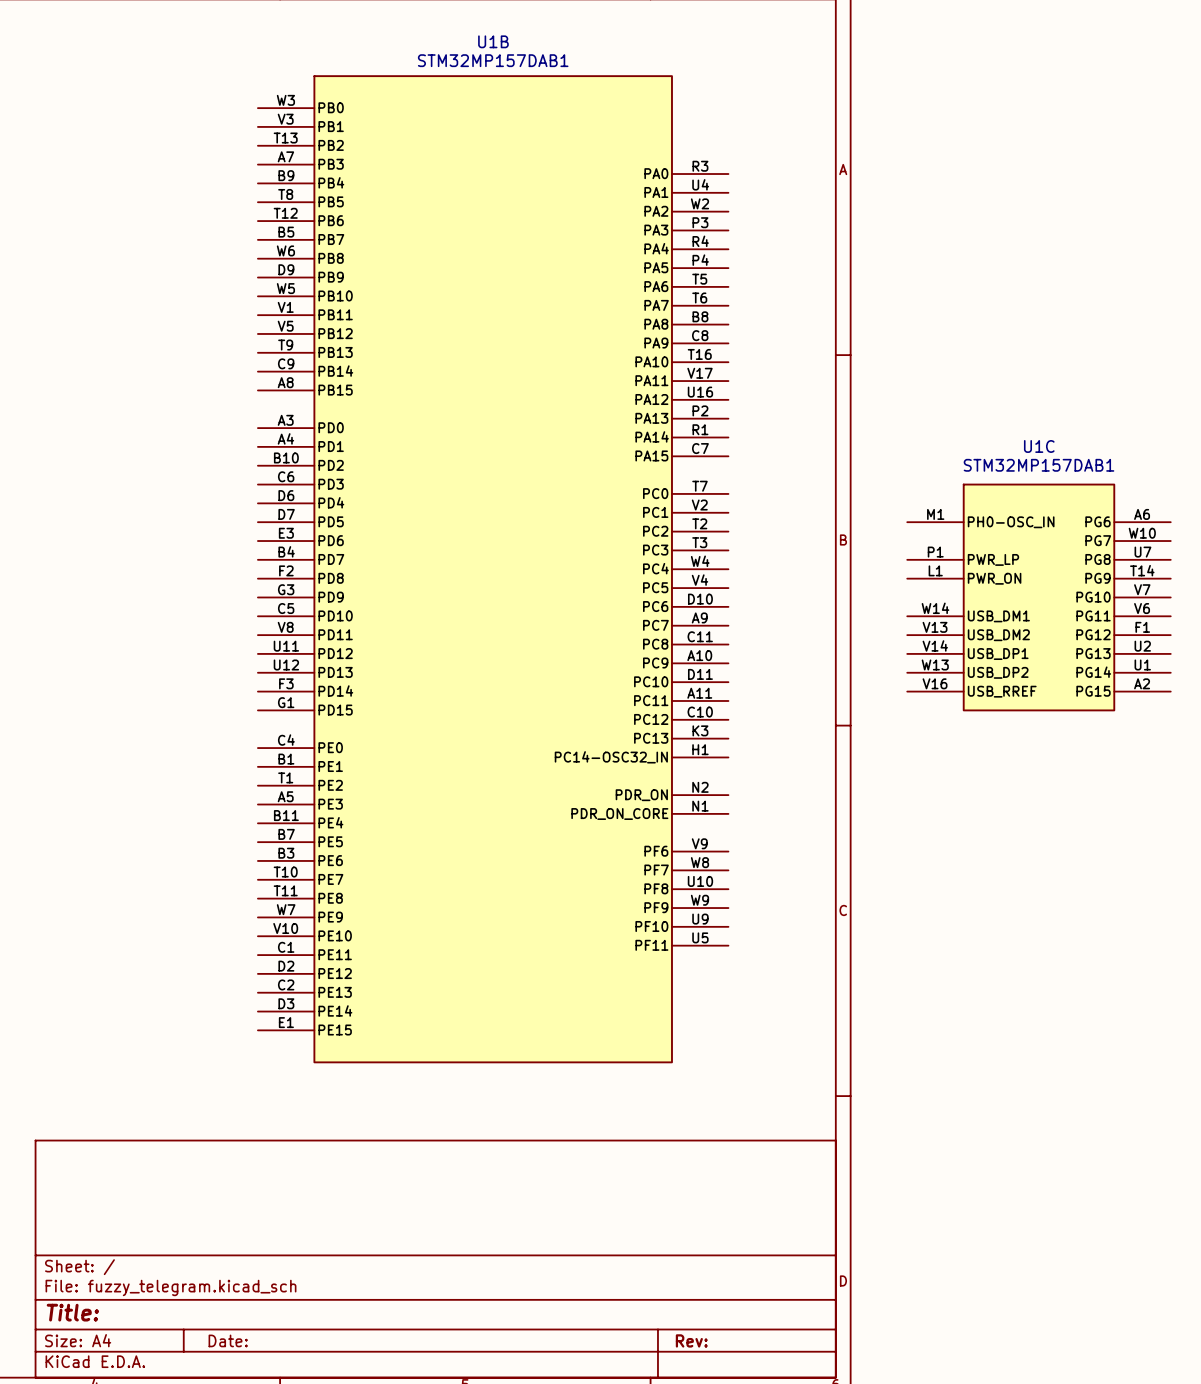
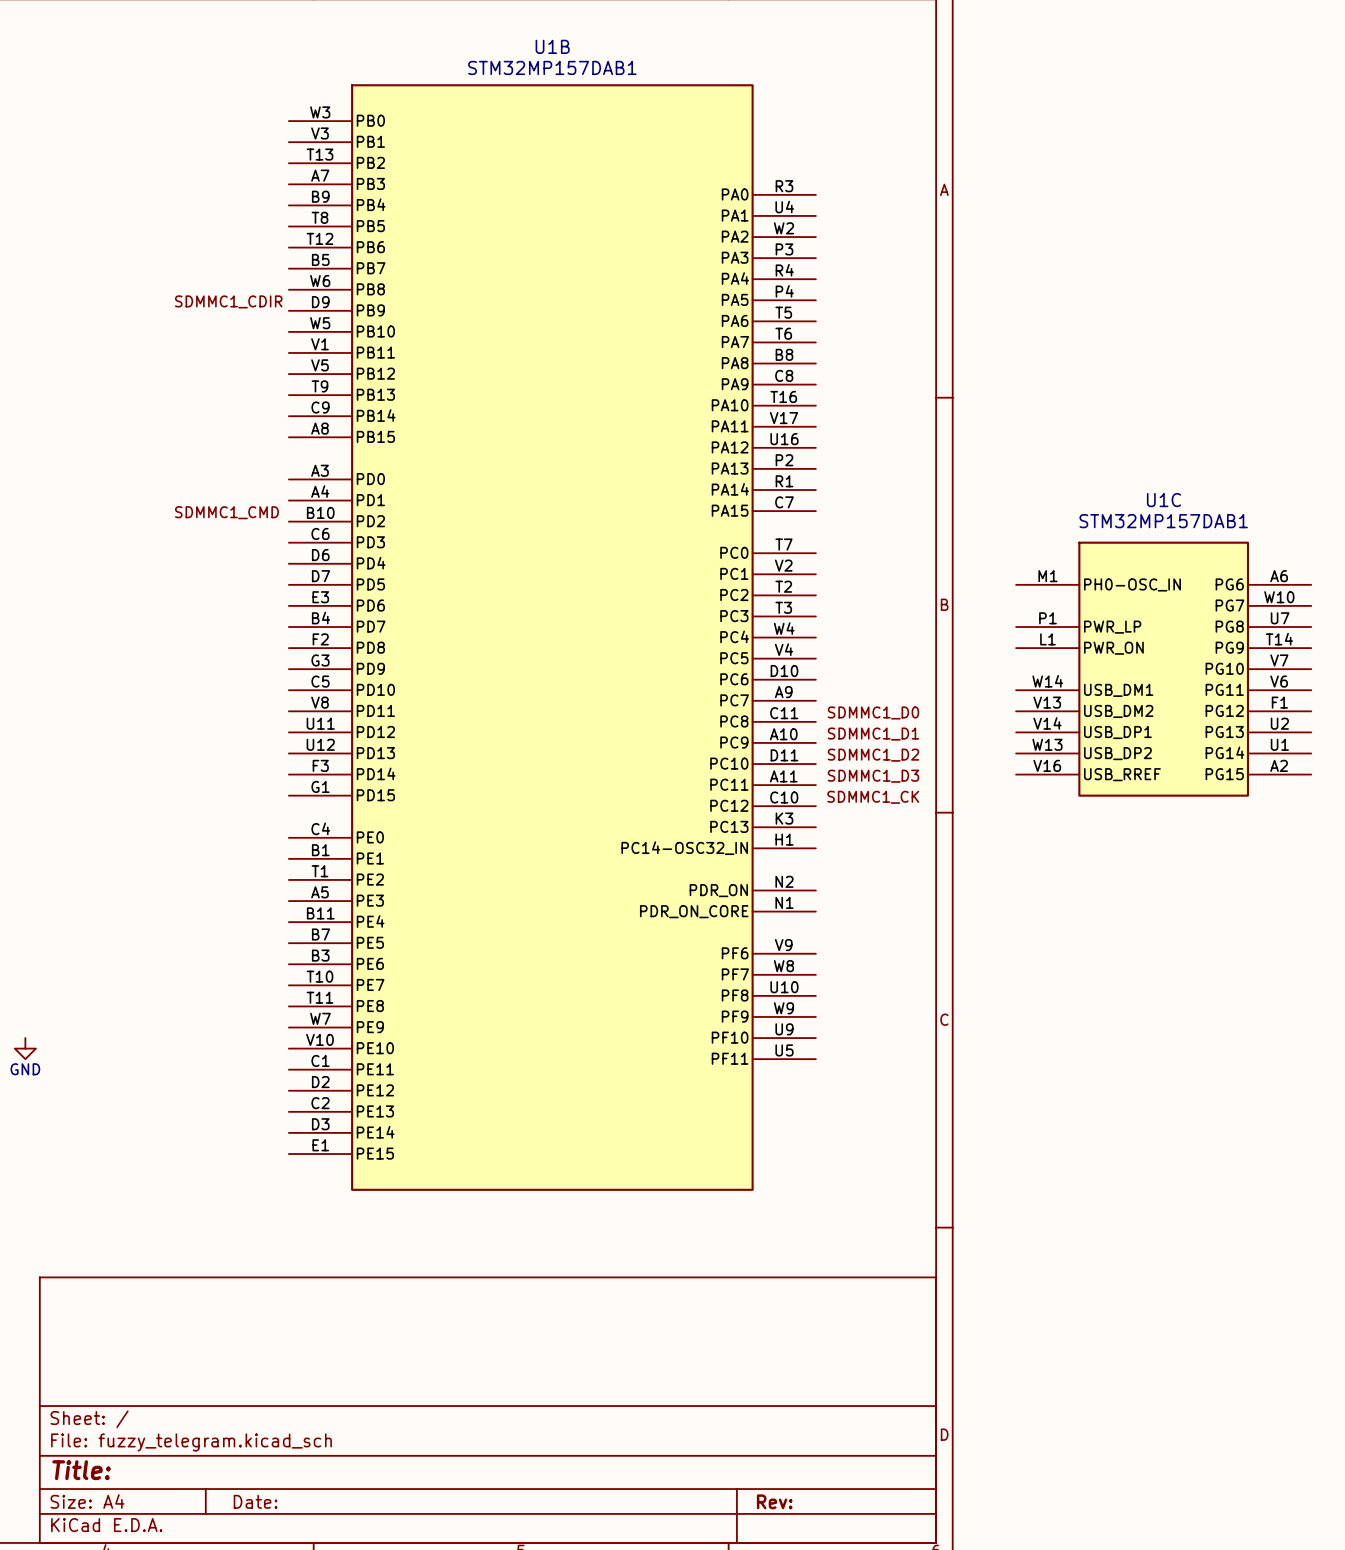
label: none -> SDMMC1_CDIR (228, 301)
label: none -> SDMMC1_CMD (226, 512)
label: none -> SDMMC1_D0 (873, 712)
label: none -> SDMMC1_D1 (873, 734)
label: none -> SDMMC1_D2 (873, 755)
label: none -> SDMMC1_D3 (873, 776)
label: none -> SDMMC1_CK (873, 797)
power symbol: none -> GND (25, 1048)

